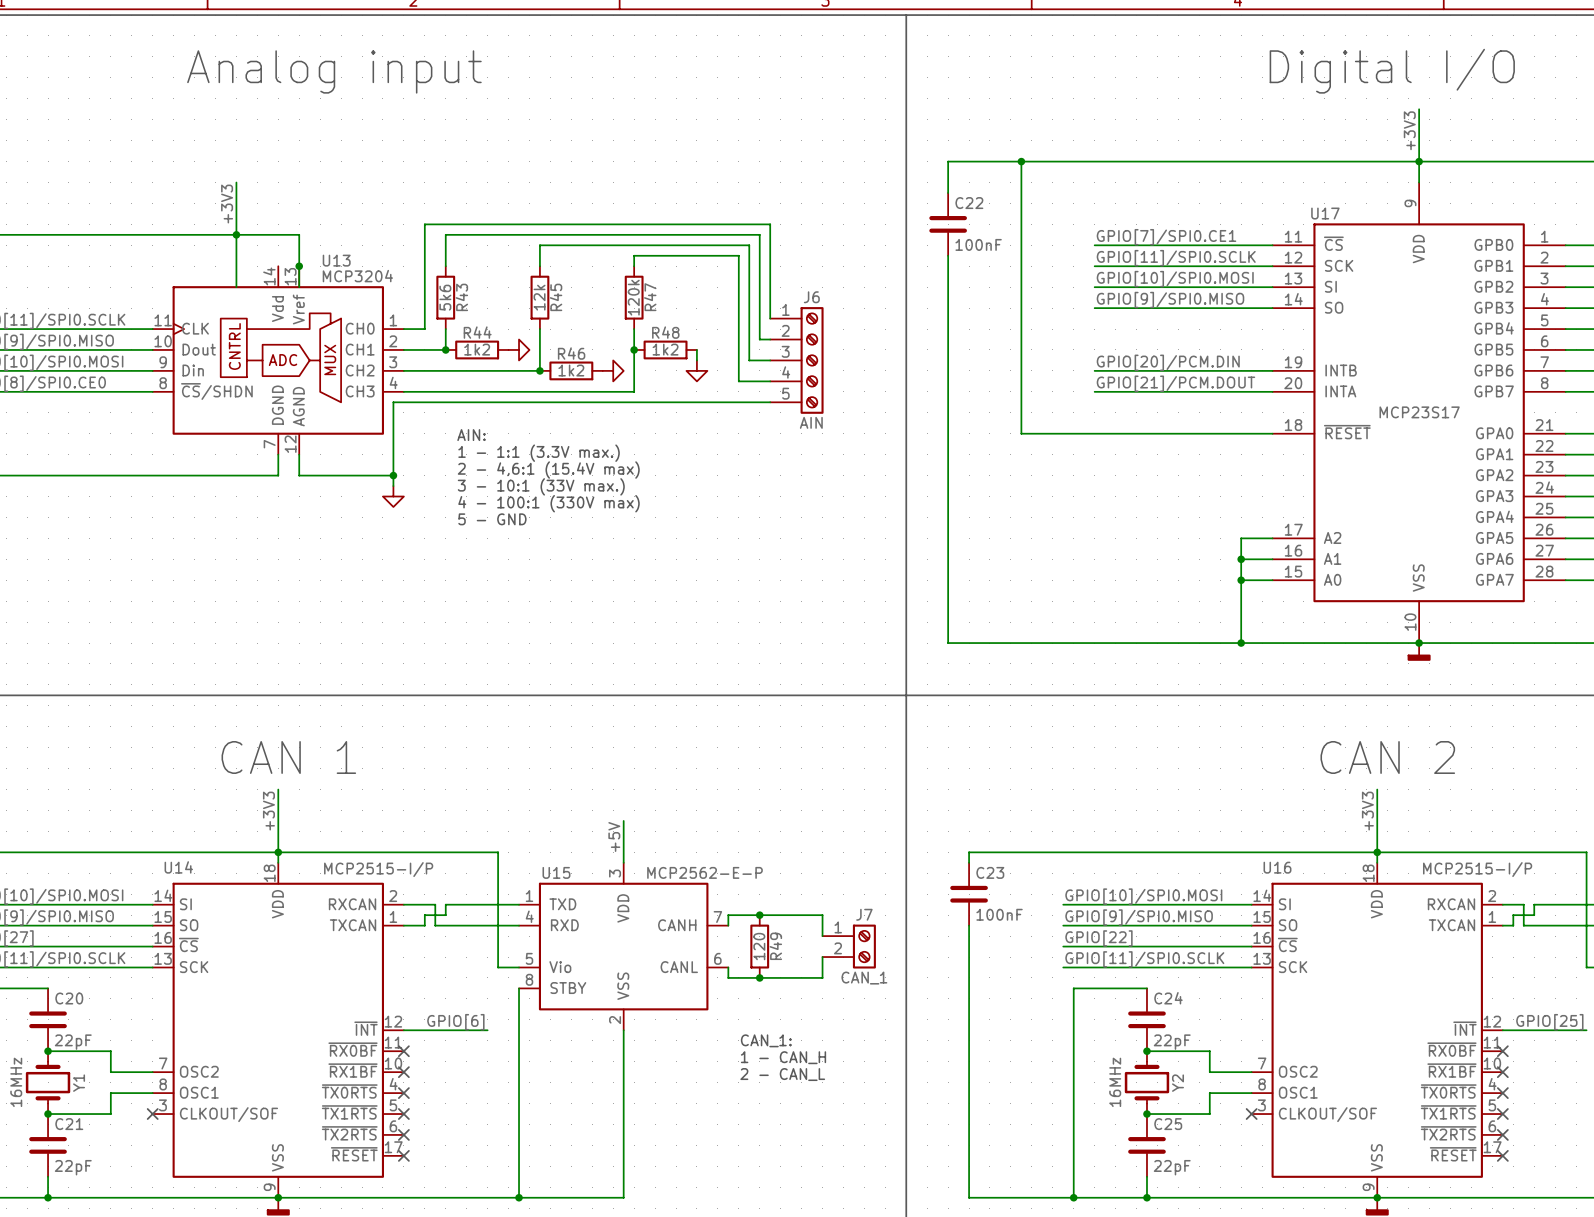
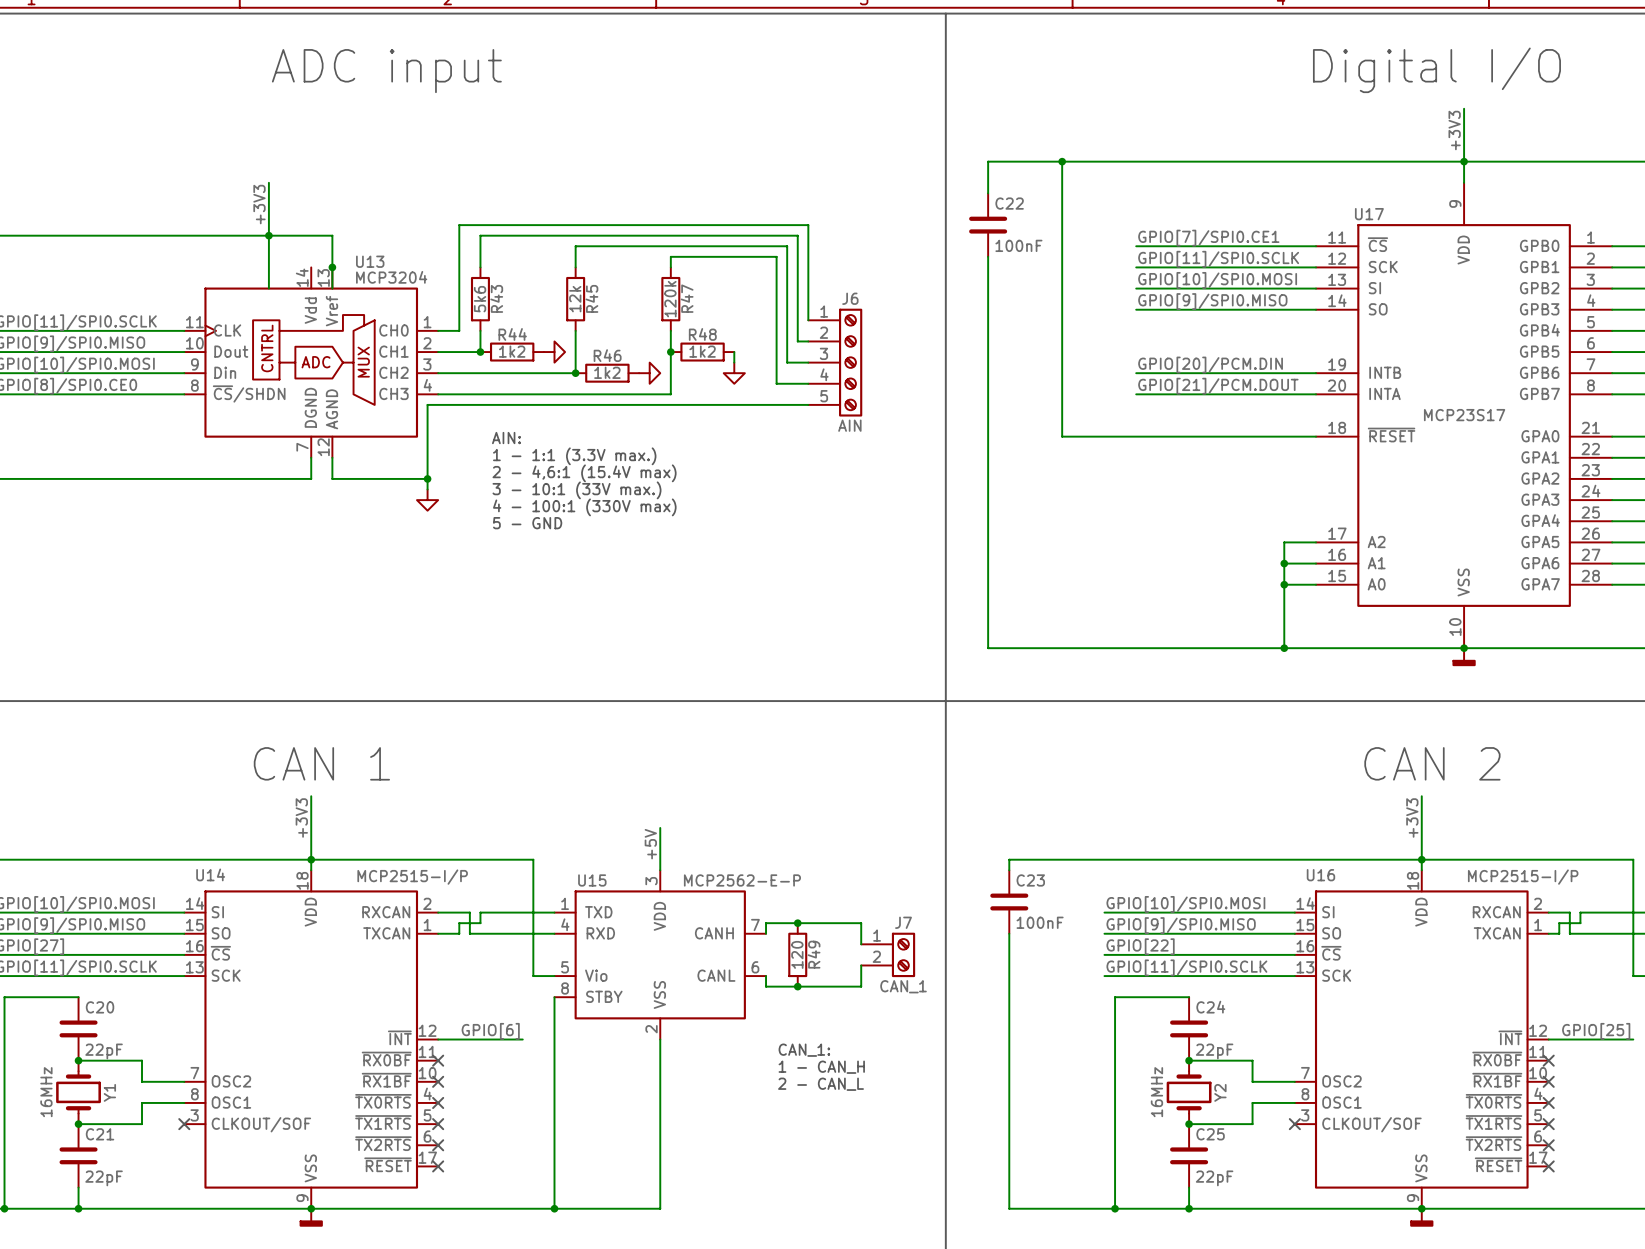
text: Analog input (334, 71) -> ADC input (386, 71)

